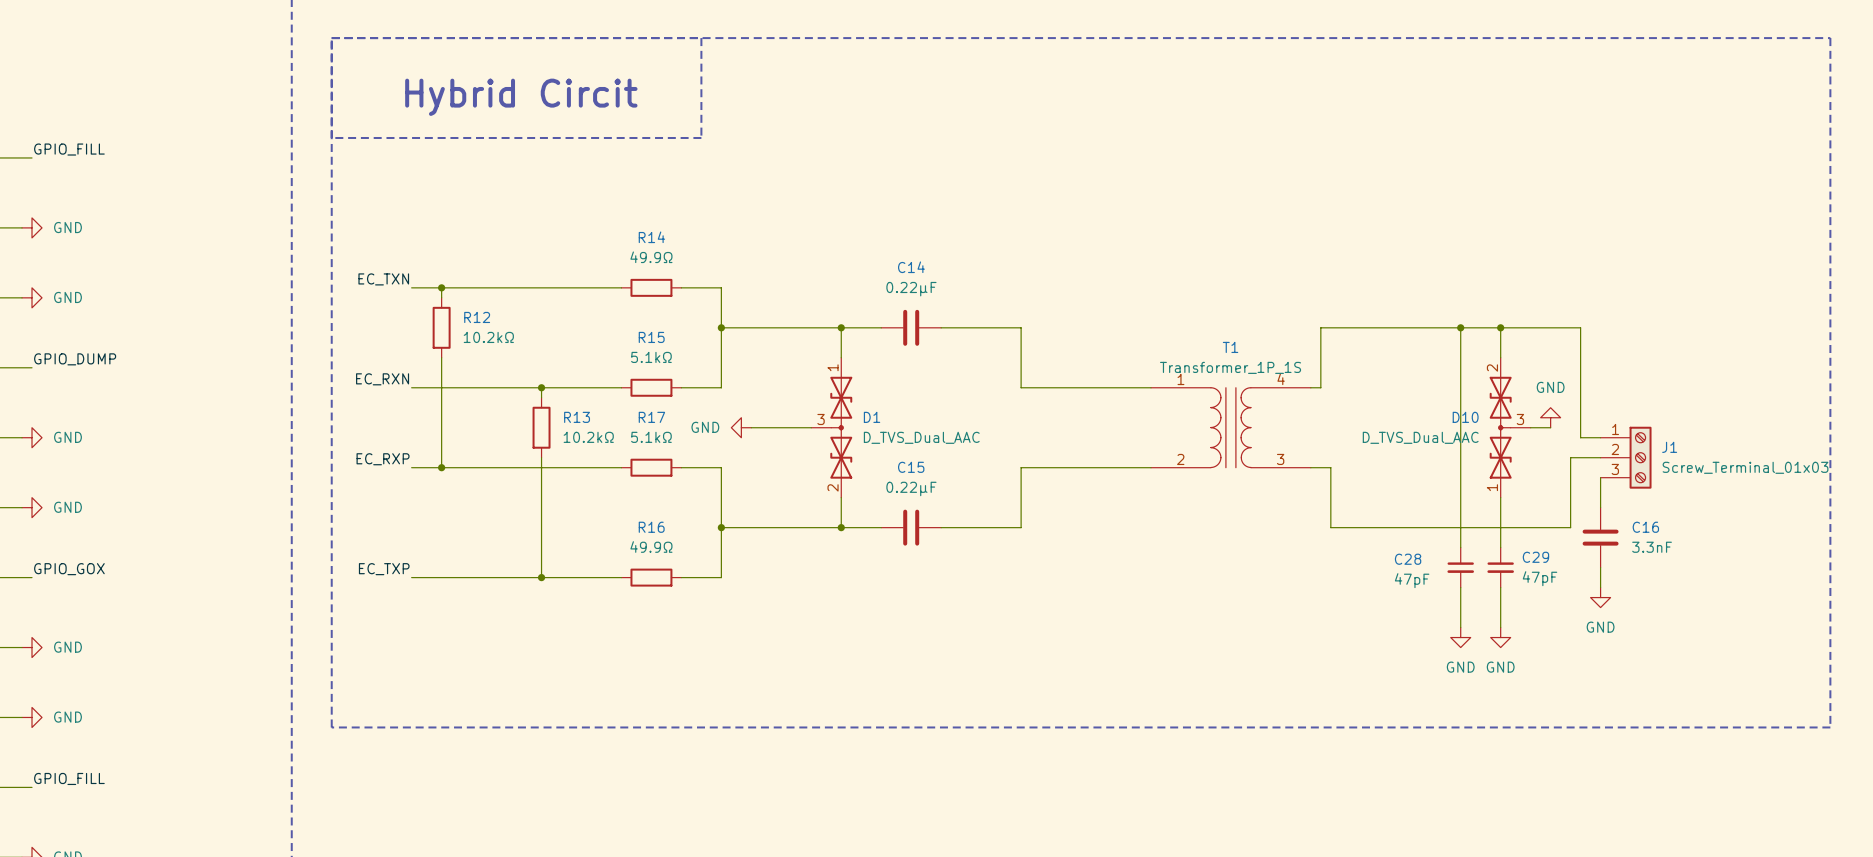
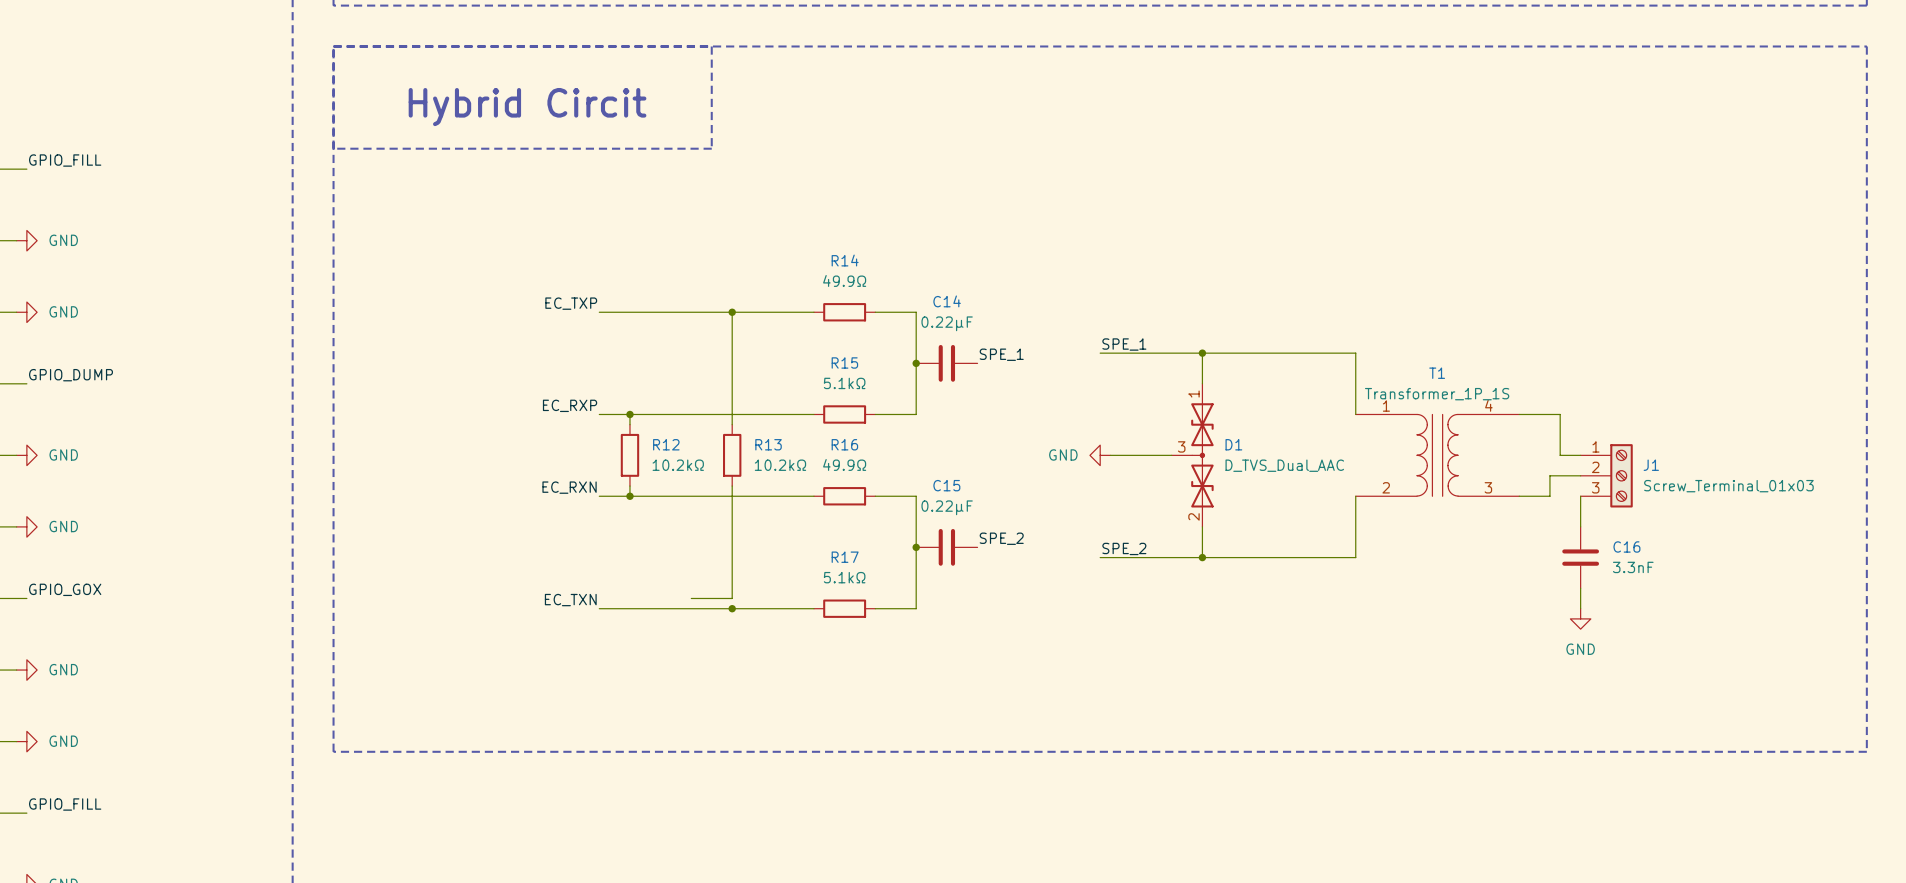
label: EC_TXN (383, 279) -> none
wire: (411, 287) (621, 287) -> (599, 312) (813, 312)
wire: (441, 287) (441, 297) -> none
junction: (441, 287) -> none
R14 position: (651, 287) -> (844, 312)
wire: (681, 287) (721, 287) (721, 297) -> none
label: none -> EC_TXP (571, 303)
wire: none -> (875, 312) (916, 312) (916, 414) (875, 414)
R12 position: (441, 327) -> (629, 455)
wire: (721, 327) (881, 327) -> none
junction position: (721, 327) -> (732, 312)
wire: (841, 327) (841, 357) -> none
junction: (841, 327) -> none
C14 position: (911, 327) -> (946, 363)
wire: (941, 327) (1021, 327) (1021, 387) (1150, 387) -> none
wire: (1460, 327) (1460, 547) -> none
junction: (1460, 327) -> none
wire: (1500, 327) (1500, 357) -> none
junction: (1500, 327) -> none
label: none -> SPE_1 (1124, 344)
wire: none -> (1100, 353) (1355, 353) (1355, 414)
wire: none -> (1202, 353) (1202, 383)
junction: none -> (1202, 353)
label: none -> SPE_1 (1001, 354)
junction: none -> (916, 363)
wire: (441, 357) (441, 467) -> none
label: EC_RXN (382, 379) -> none
wire: (411, 387) (621, 387) -> (599, 414) (813, 414)
wire: (541, 387) (541, 397) -> (629, 414) (629, 424)
junction: (541, 387) -> none
R15 position: (651, 387) -> (844, 414)
wire: (681, 387) (721, 387) -> (732, 424) (732, 404)
wire: (1310, 387) (1320, 387) (1320, 327) (1580, 327) (1580, 437) (1600, 437) -> none
junction: none -> (629, 414)
wire: none -> (1519, 414) (1560, 414) (1560, 455) (1580, 455)
power symbol: GND (1550, 417) -> none
R13 position: (541, 427) -> (732, 455)
power symbol: GND (741, 427) -> none
wire: (751, 427) (811, 427) -> none
D1 position: (831, 427) -> (1192, 455)
T1 position: (1230, 427) -> (1437, 455)
D10: D_TVS_Dual_AAC (1510, 427) -> none
wire: (1530, 427) (1550, 427) -> none
power symbol: none -> GND (1100, 455)
wire: none -> (1110, 455) (1171, 455)
wire: (541, 457) (541, 577) -> none
wire: none -> (1580, 475) (1549, 475) (1549, 496) (1519, 496)
wire: (1600, 457) (1570, 457) (1570, 527) (1330, 527) -> (1100, 557) (1355, 557) (1355, 547)
J1 position: (1626, 457) -> (1606, 475)
label position: EC_RXP (383, 459) -> EC_RXP (570, 405)
wire: (411, 467) (621, 467) -> (629, 496) (629, 486)
junction: (441, 467) -> none
R17 position: (651, 467) -> (844, 608)
wire: (681, 467) (721, 467) -> none
wire: (1150, 467) (1021, 467) (1021, 527) (941, 527) -> none
wire: (1310, 467) (1330, 467) (1330, 477) -> none
label: none -> EC_RXN (569, 487)
wire: none -> (599, 496) (813, 496)
junction: none -> (629, 496)
wire: none -> (875, 496) (916, 496) (916, 608) (875, 608)
wire: (1600, 477) (1600, 507) -> (1580, 496) (1580, 526)
wire: (841, 497) (841, 527) -> none
wire: (1500, 497) (1500, 547) -> none
wire: none -> (1202, 526) (1202, 557)
label: none -> SPE_2 (1001, 538)
wire: (721, 527) (881, 527) -> none
junction: (721, 527) -> none
junction: (841, 527) -> none
junction: none -> (916, 547)
C15 position: (911, 527) -> (946, 547)
label: none -> SPE_2 (1124, 548)
junction: none -> (1202, 557)
C16 position: (1600, 537) -> (1580, 557)
C28: 47pF (1460, 567) -> none
C29: 47pF (1500, 567) -> none
wire: (1600, 567) (1600, 587) -> (1580, 588) (1580, 608)
label: EC_TXP (384, 569) -> none
wire: (411, 577) (621, 577) -> (599, 608) (813, 608)
junction: (541, 577) -> none
R16 position: (651, 577) -> (844, 496)
label: none -> EC_TXN (570, 600)
junction: none -> (732, 608)
wire: (1460, 587) (1460, 627) -> none
wire: (1500, 587) (1500, 627) -> none
power symbol: none -> GND (1580, 618)
power symbol: GND (1600, 597) -> none
power symbol: GND (1460, 637) -> none
power symbol: GND (1500, 637) -> none

